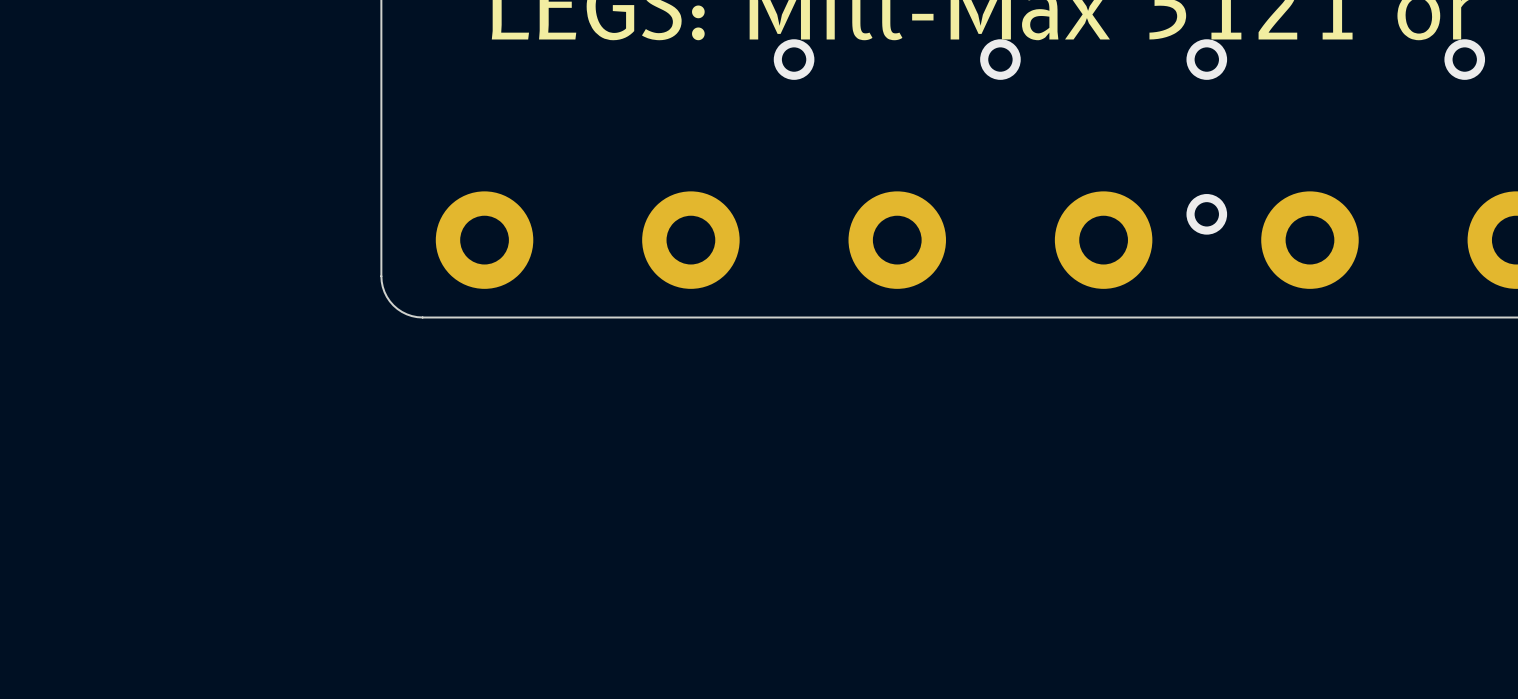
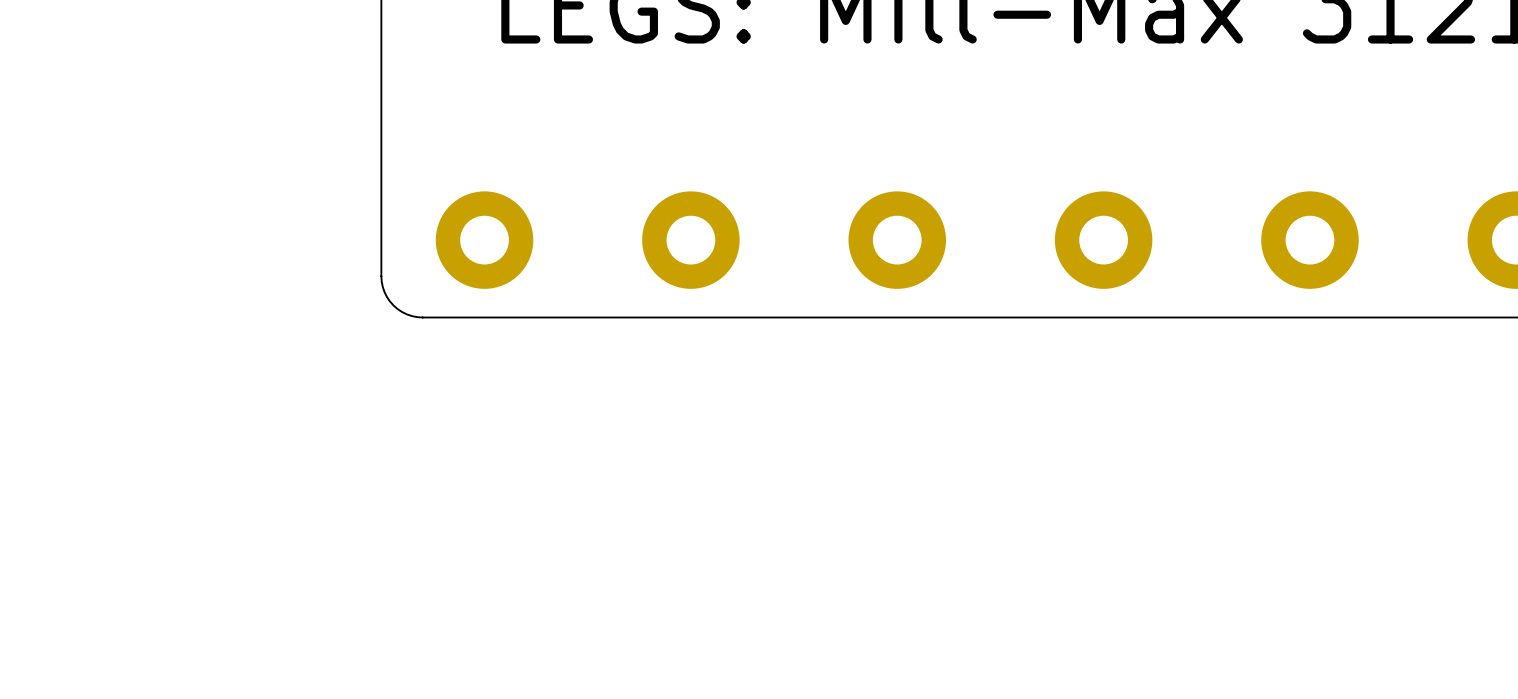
via: (794, 59) -> none
via: (1000, 59) -> none
via: (1206, 59) -> none
via: (1464, 59) -> none
via: (1206, 214) -> none

